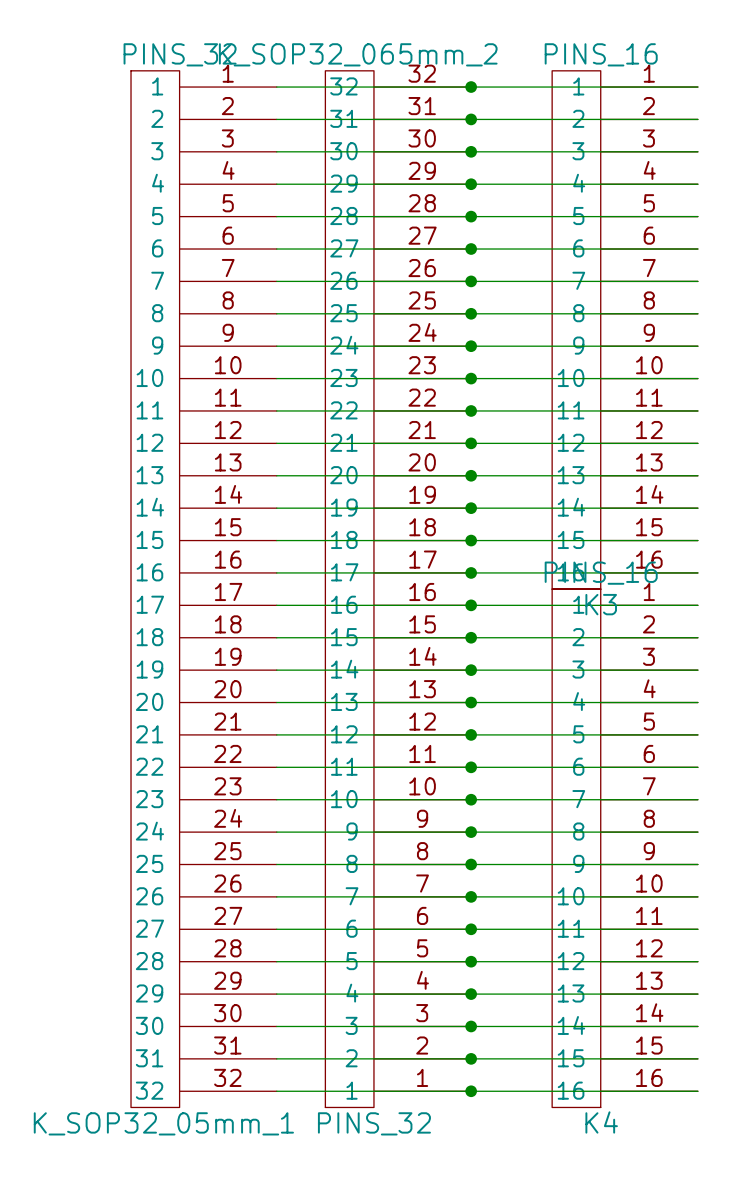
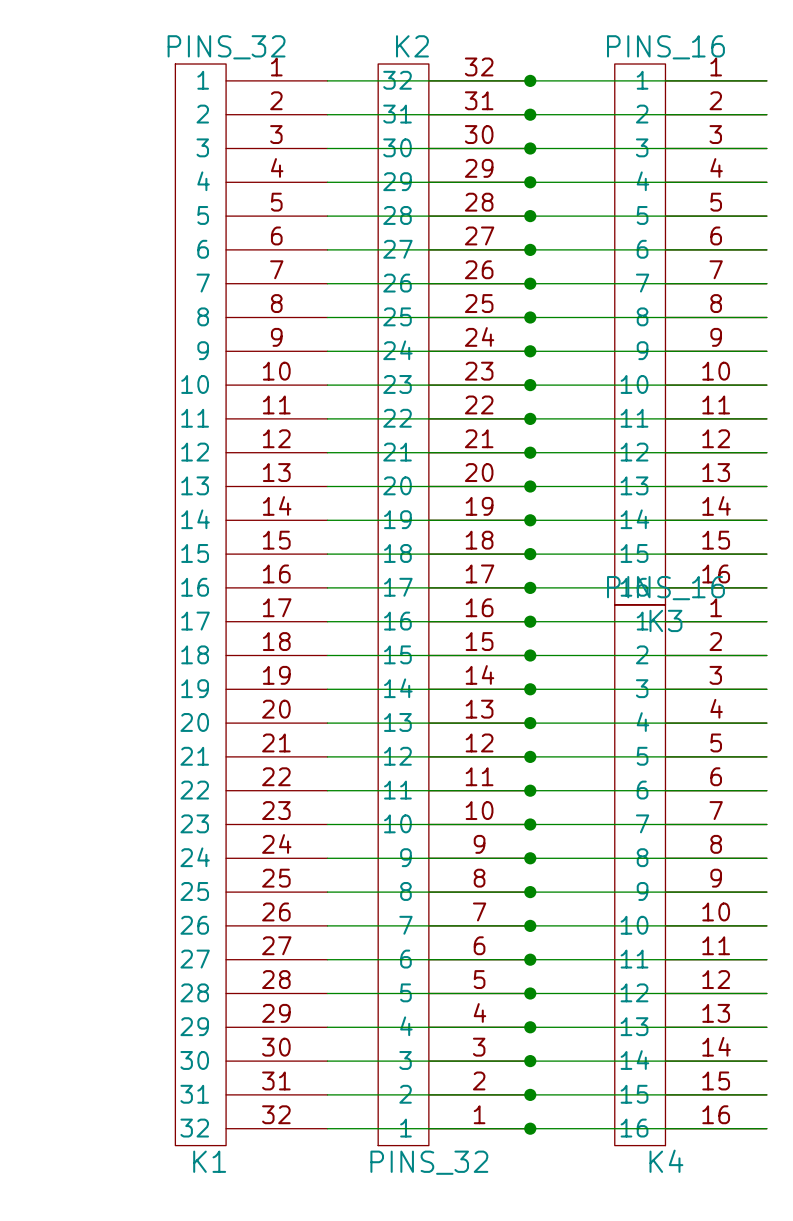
K_SOP32_065mm_2 name: K_SOP32_065mm_2 (358, 54) -> K2 (412, 46)
K_SOP32_05mm_1 name: K_SOP32_05mm_1 (163, 1123) -> K1 (209, 1161)

